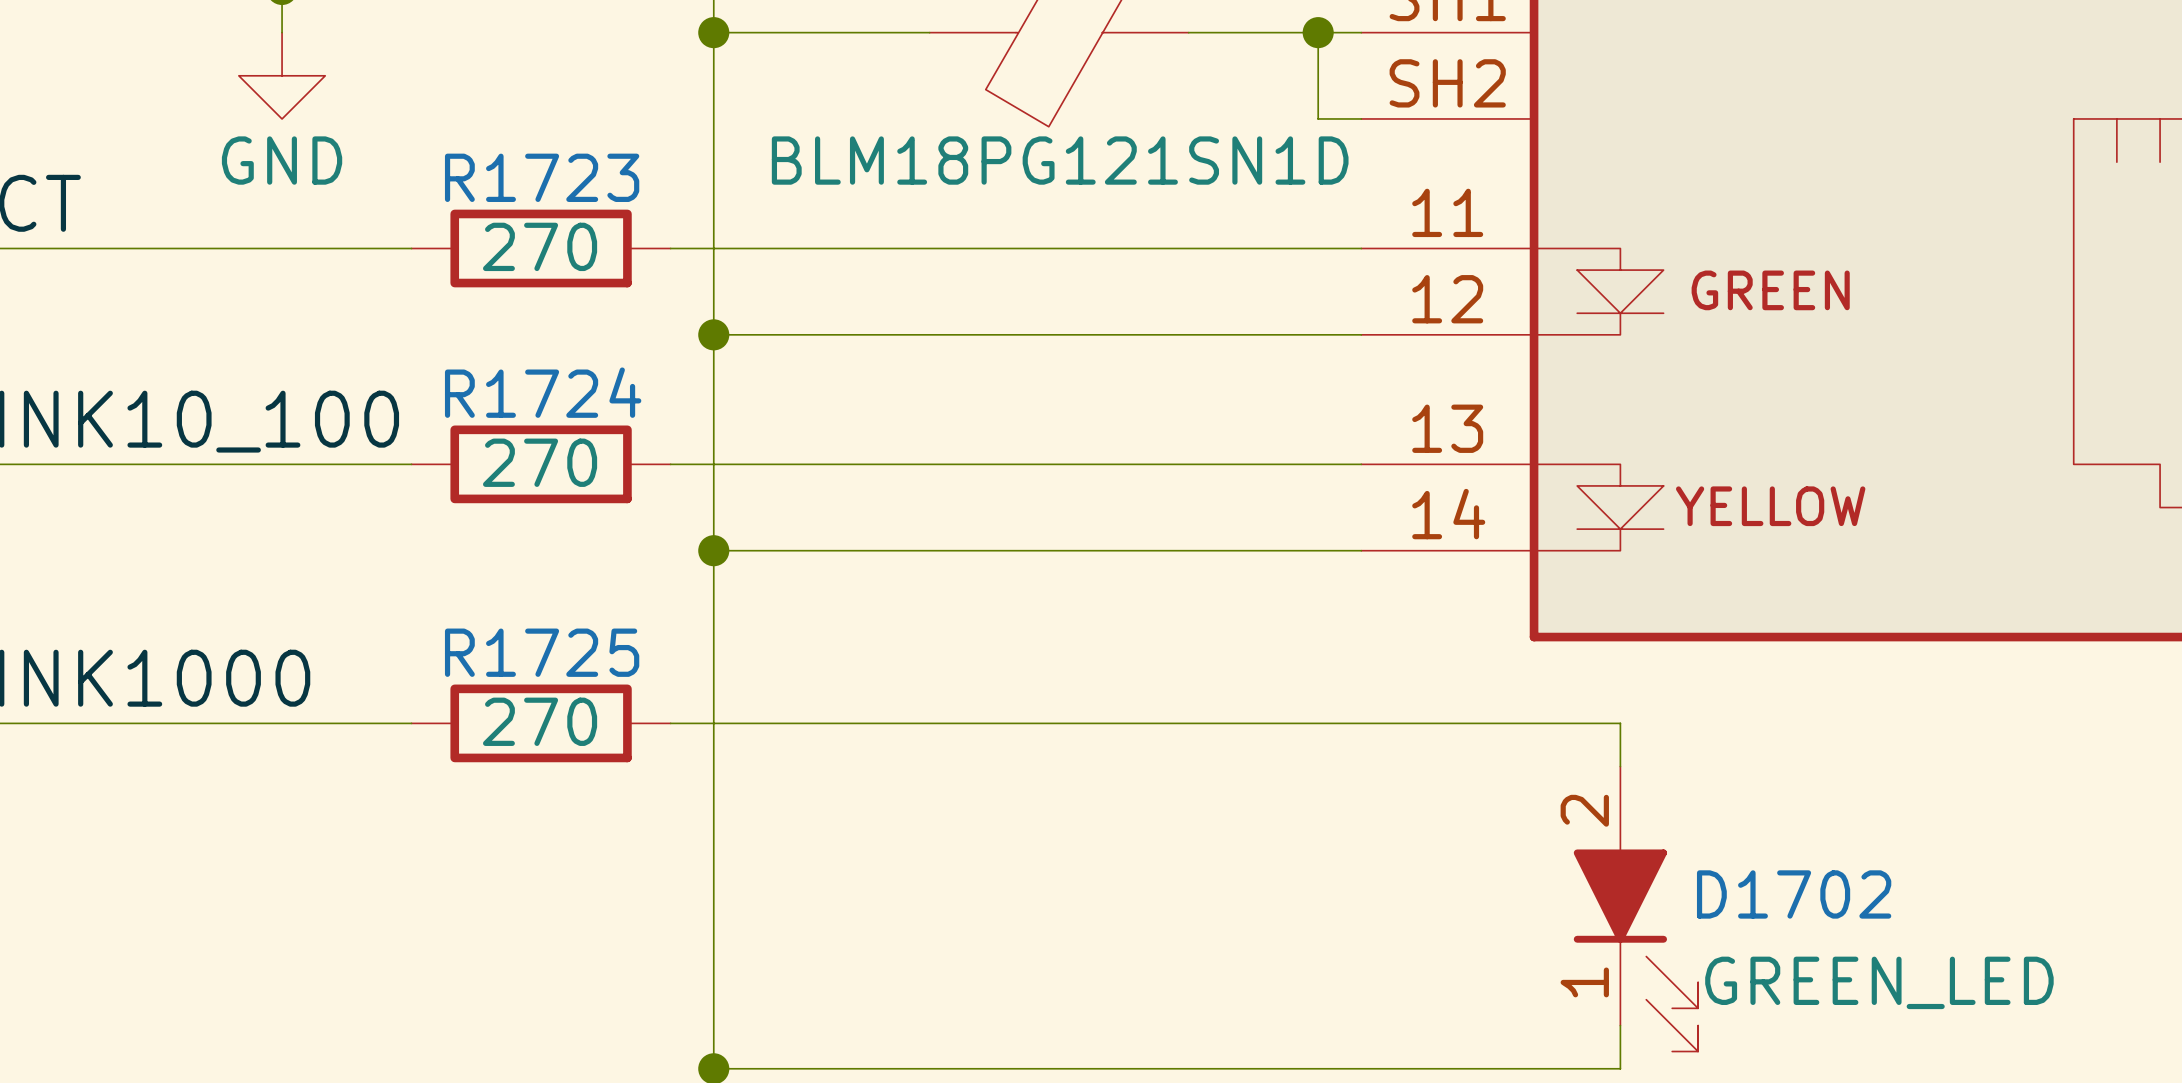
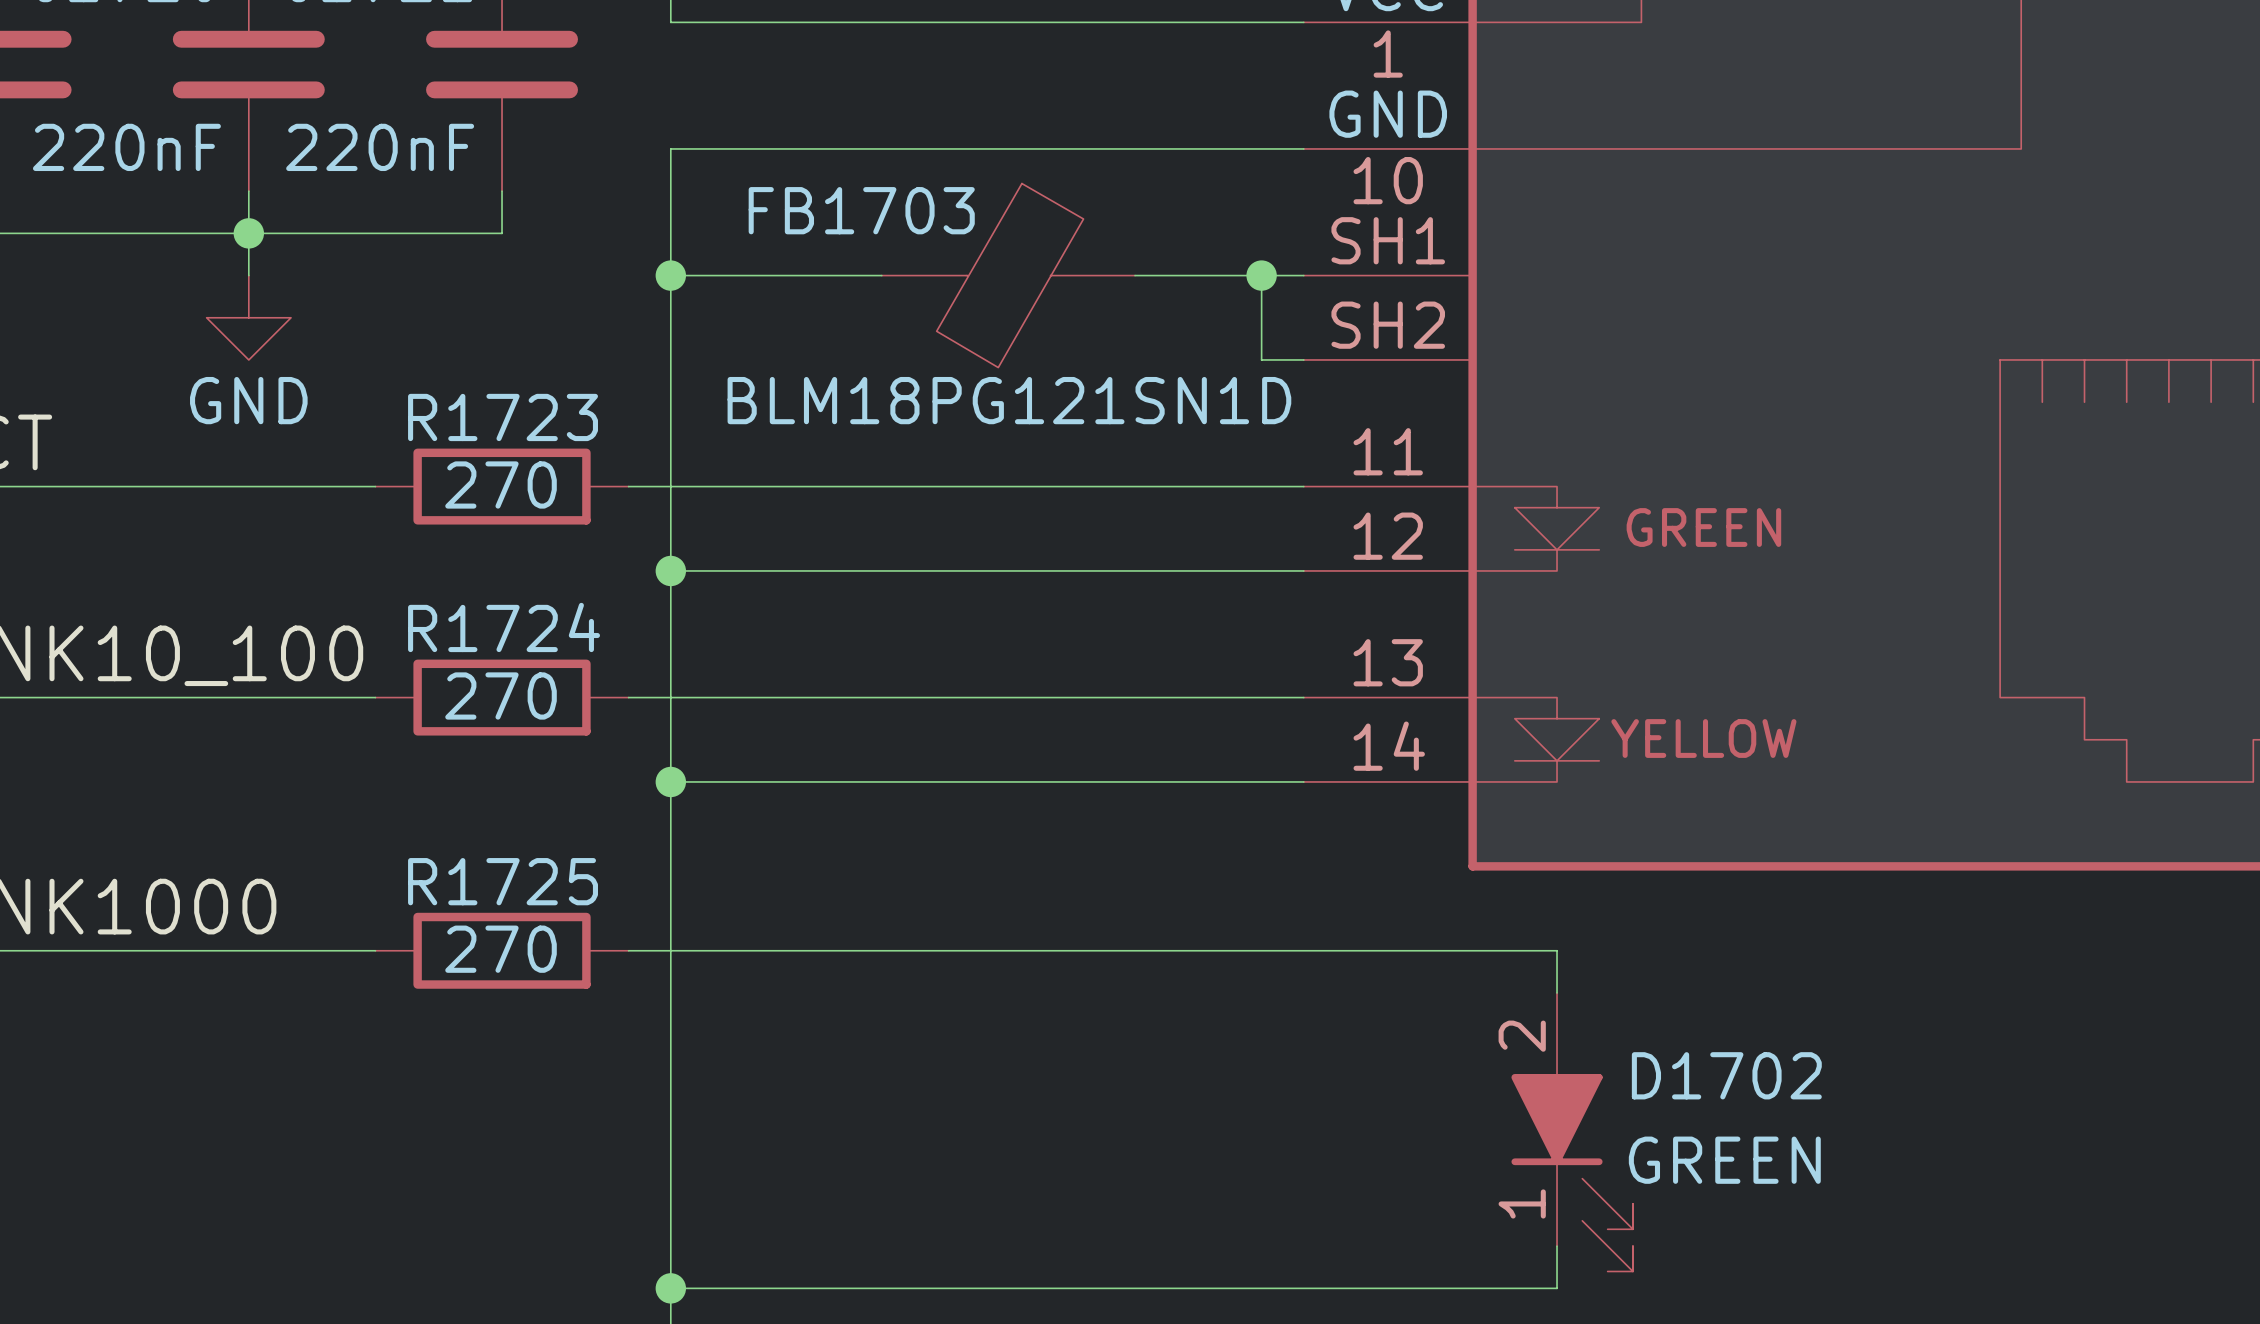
D1702 name position: D1702 (1794, 894) -> D1702 (1726, 1075)
D1702 value: GREEN_LED (1879, 982) -> GREEN (1724, 1160)

